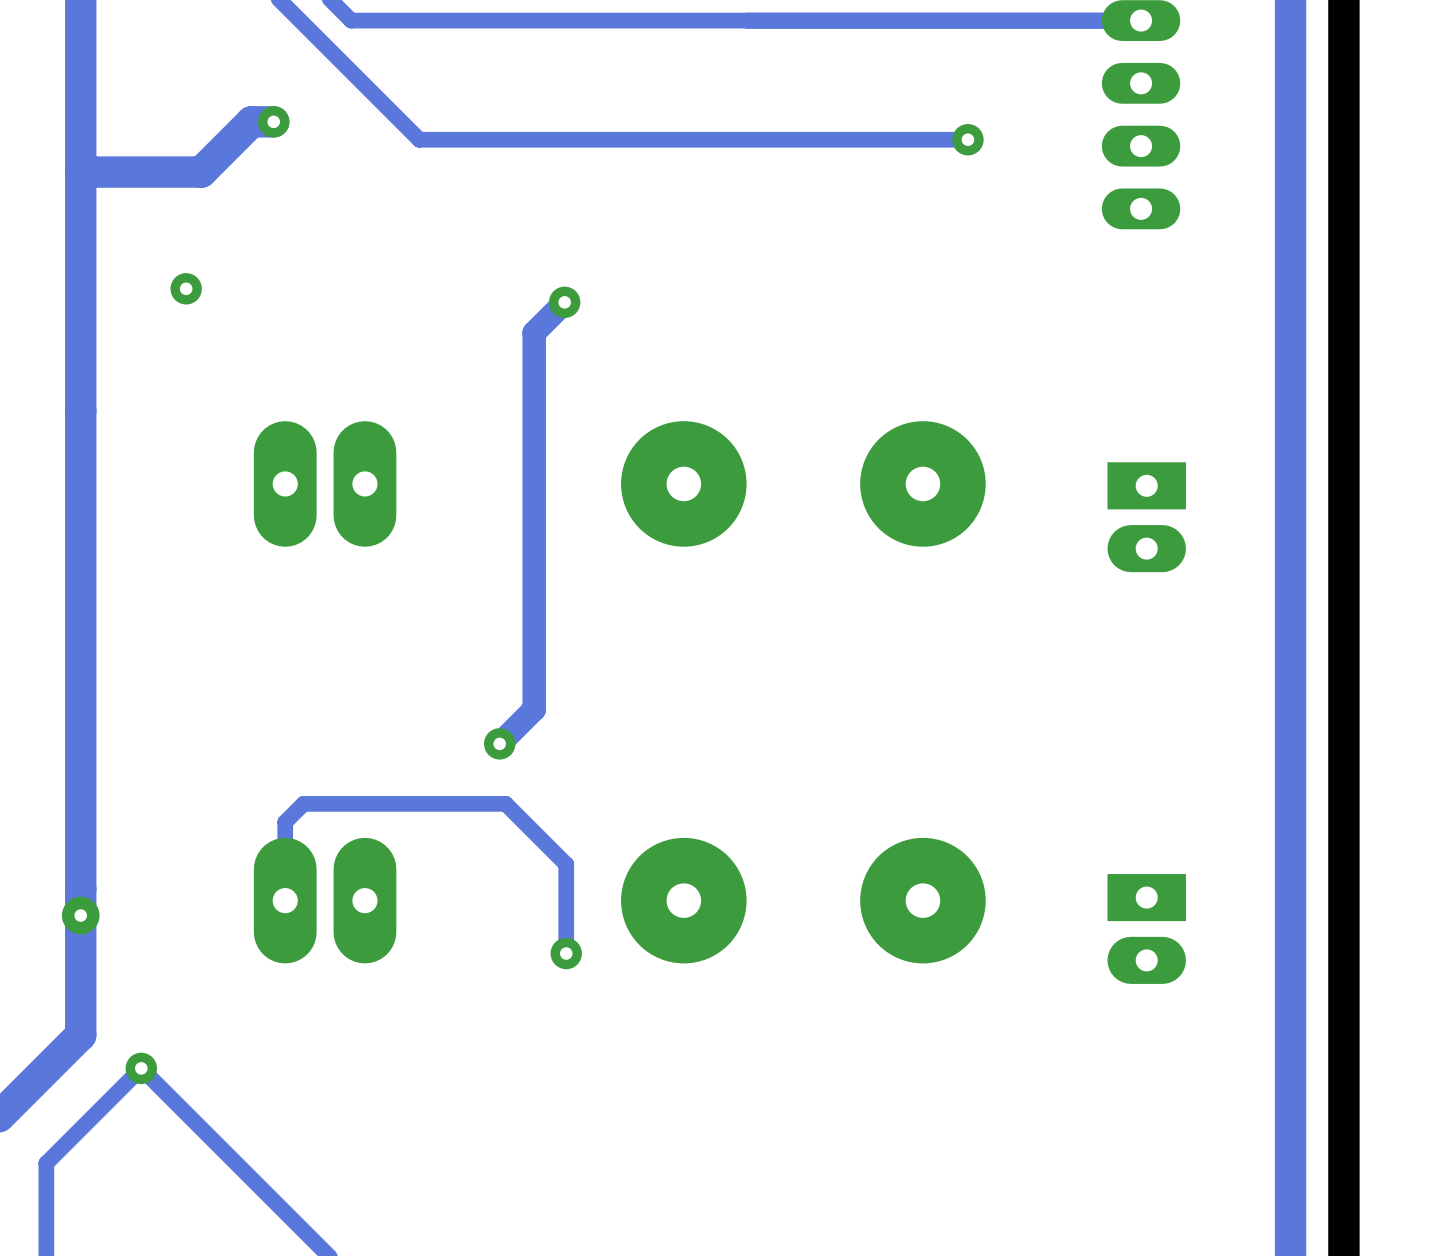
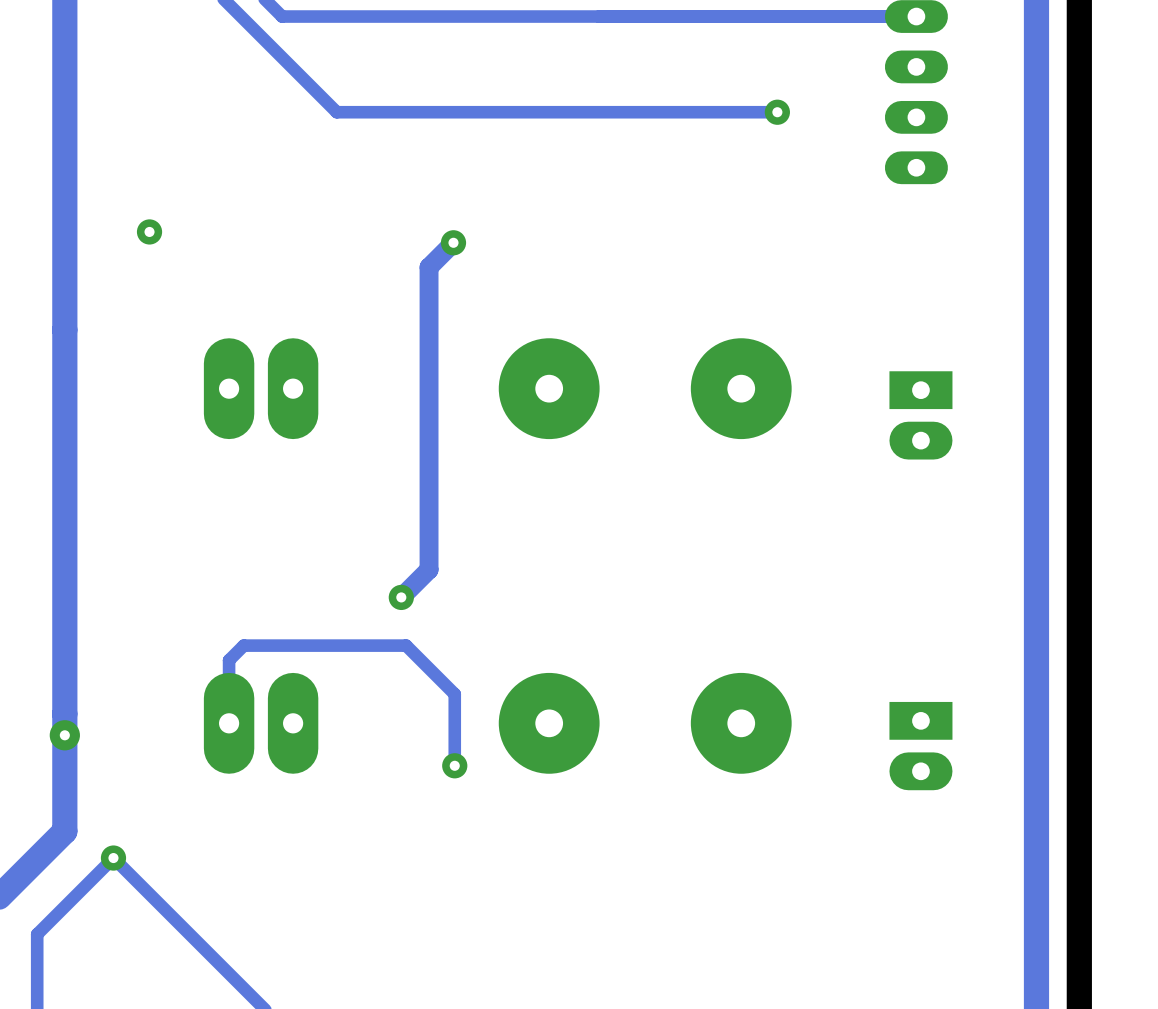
track: (273, 121) (251, 121) (201, 172) (80, 172) -> none
via: (273, 121) -> none

